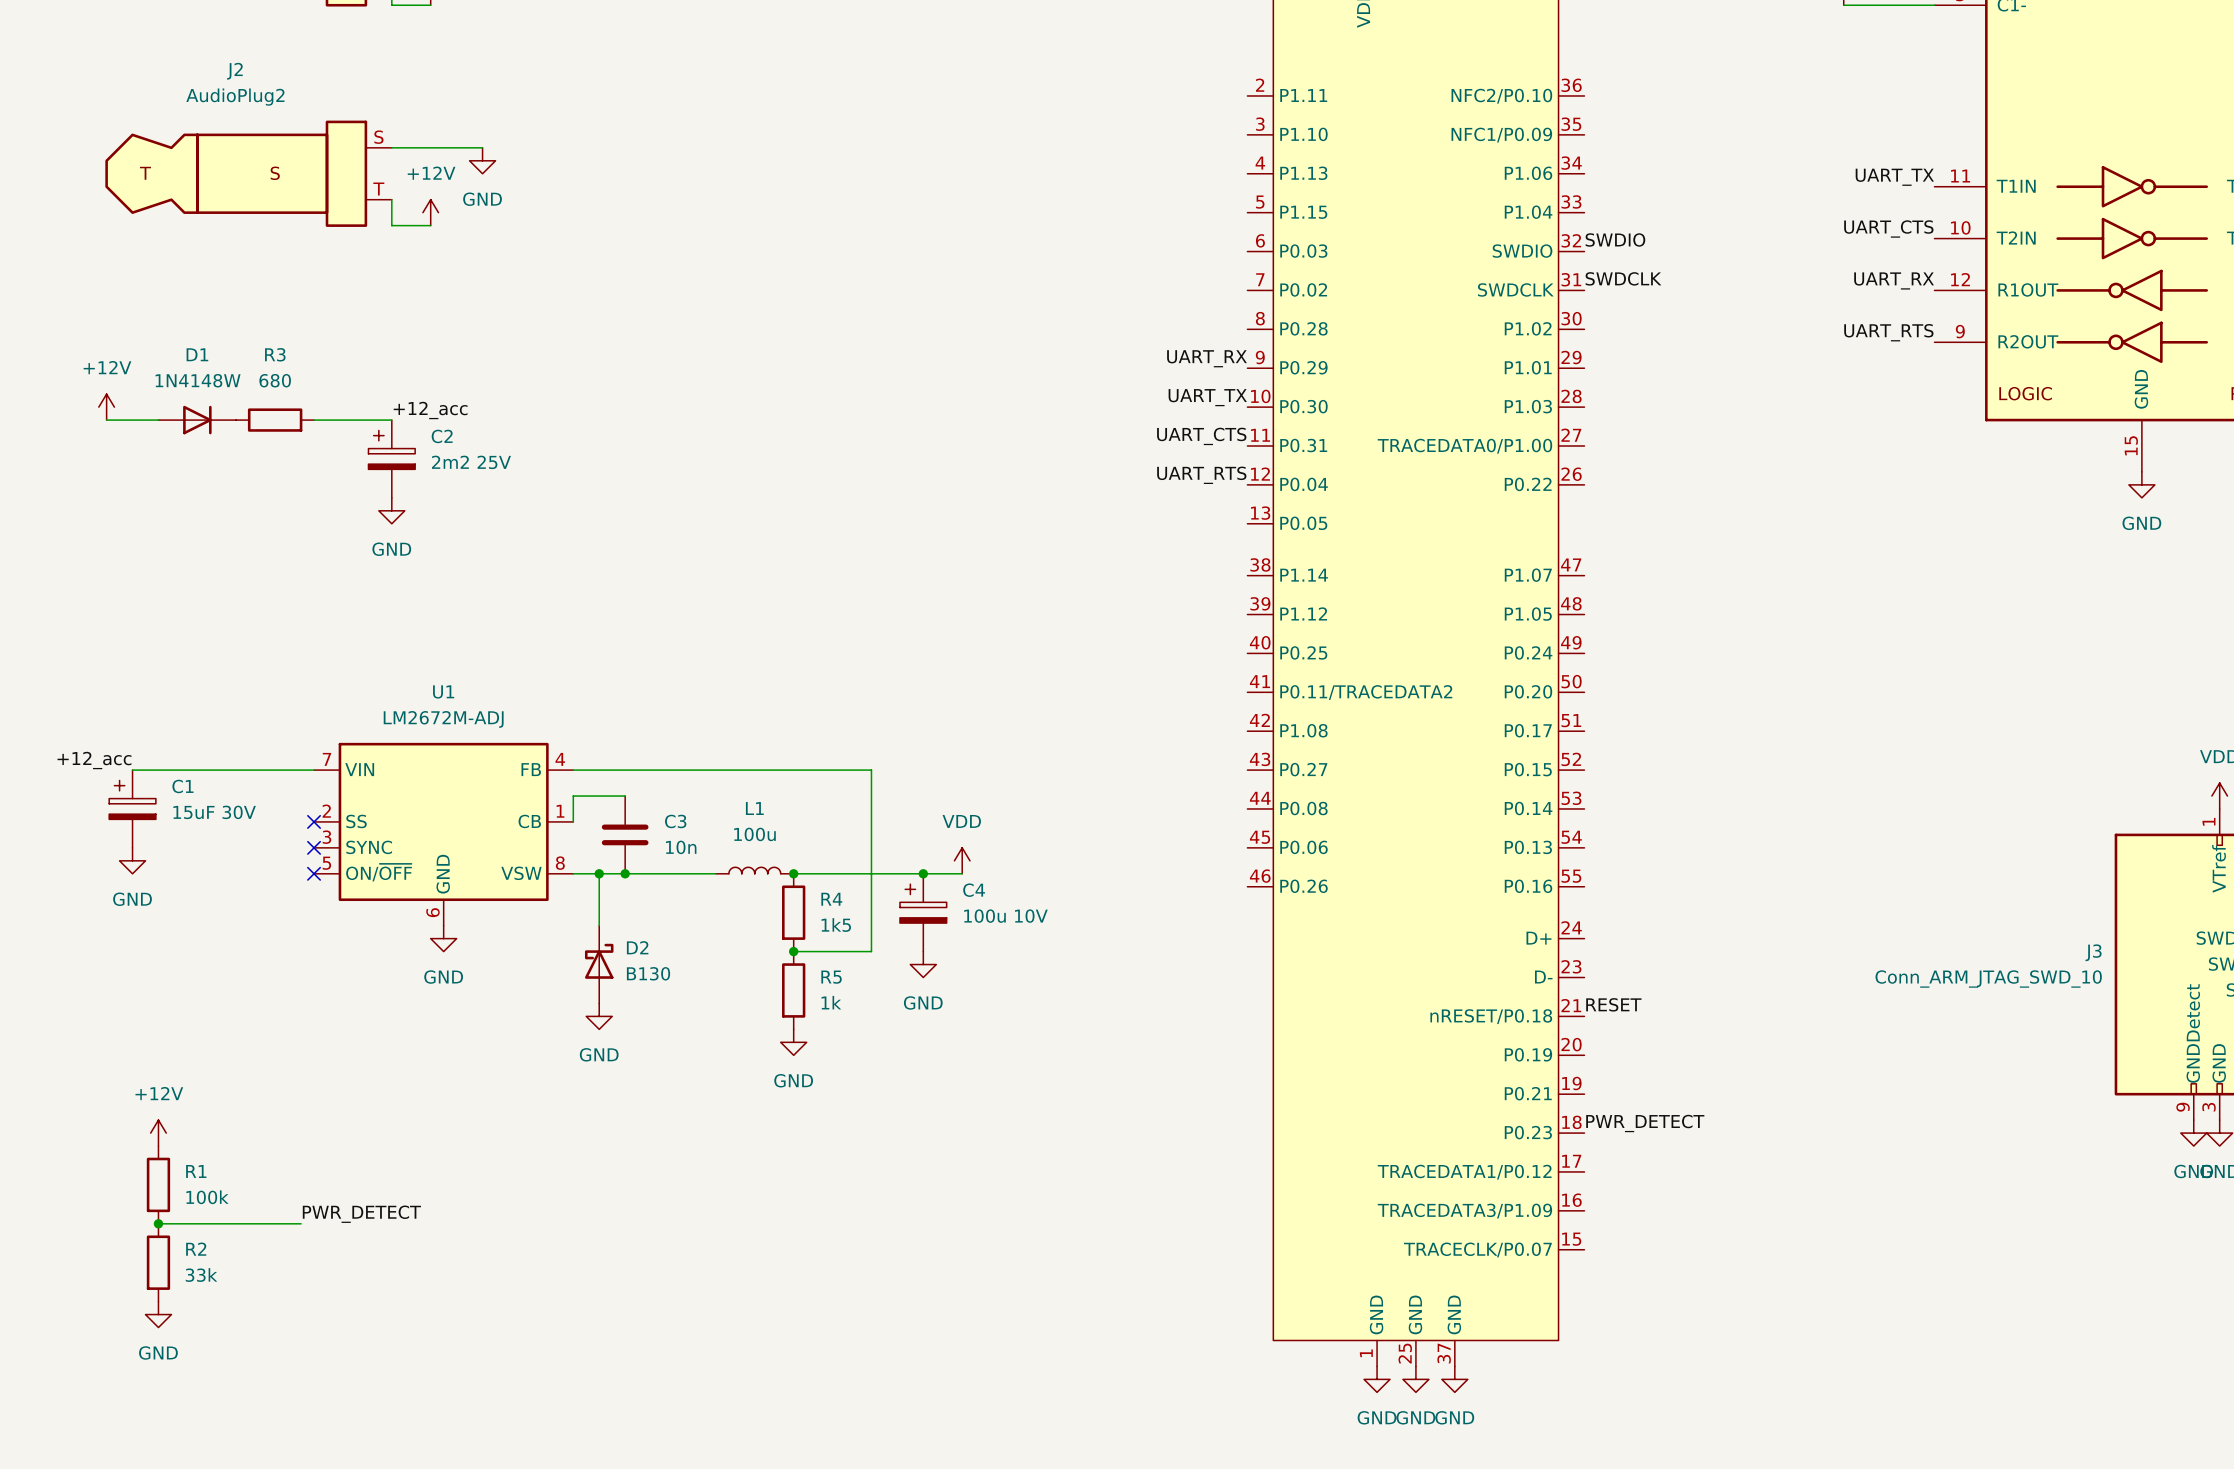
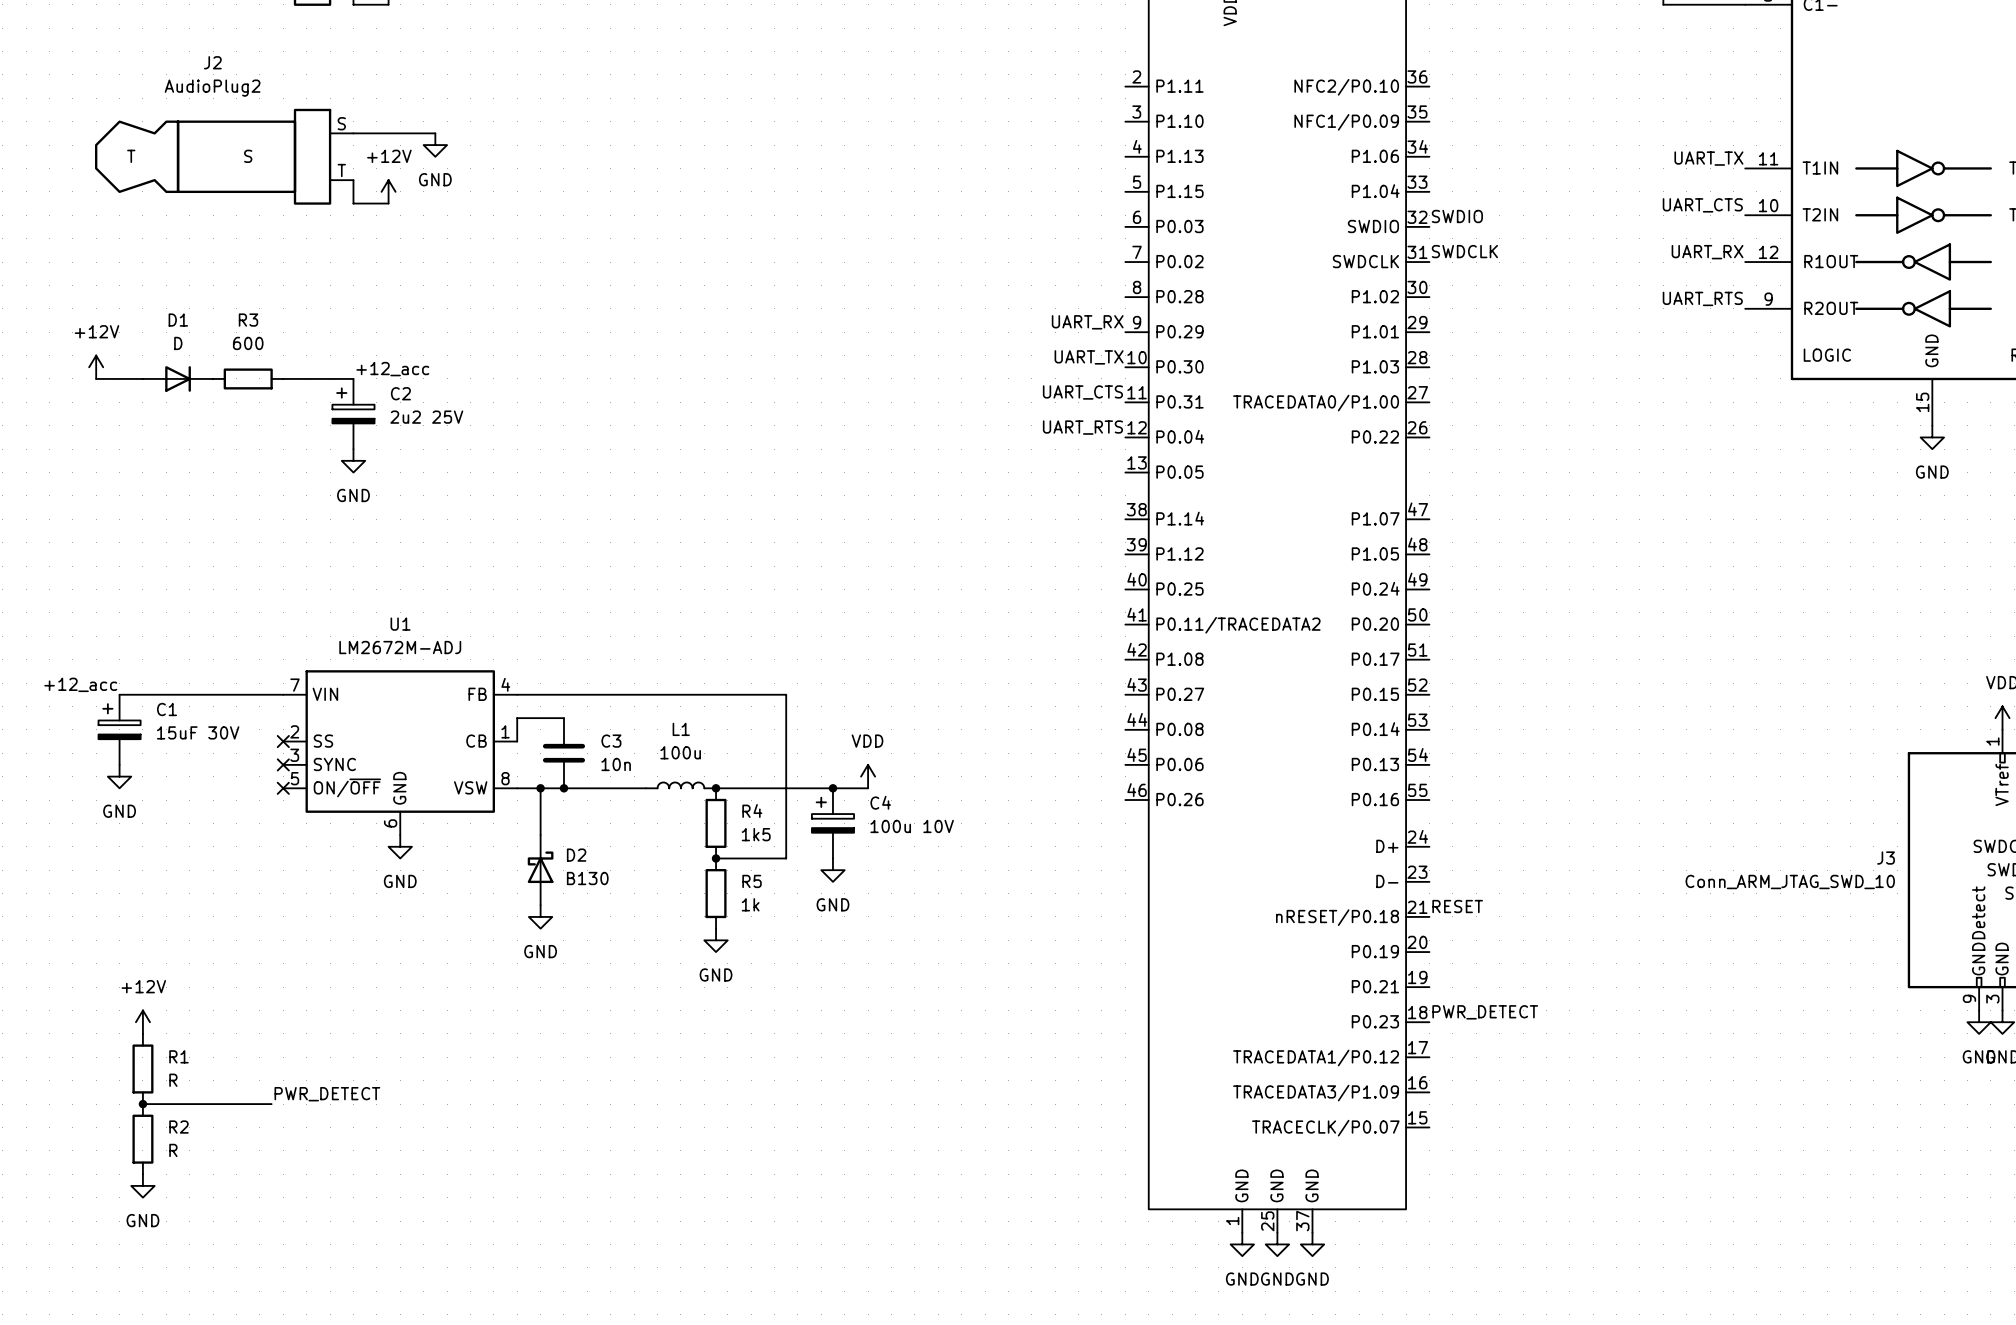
D1 value: 1N4148W (198, 380) -> D (178, 343)
R3 value: 680 (275, 380) -> 600 (248, 343)
C2 value: 2m2 25V (471, 462) -> 2u2 25V (426, 417)
R1 value: 100k (207, 1197) -> R (173, 1080)
R2 value: 33k (201, 1275) -> R (173, 1150)

